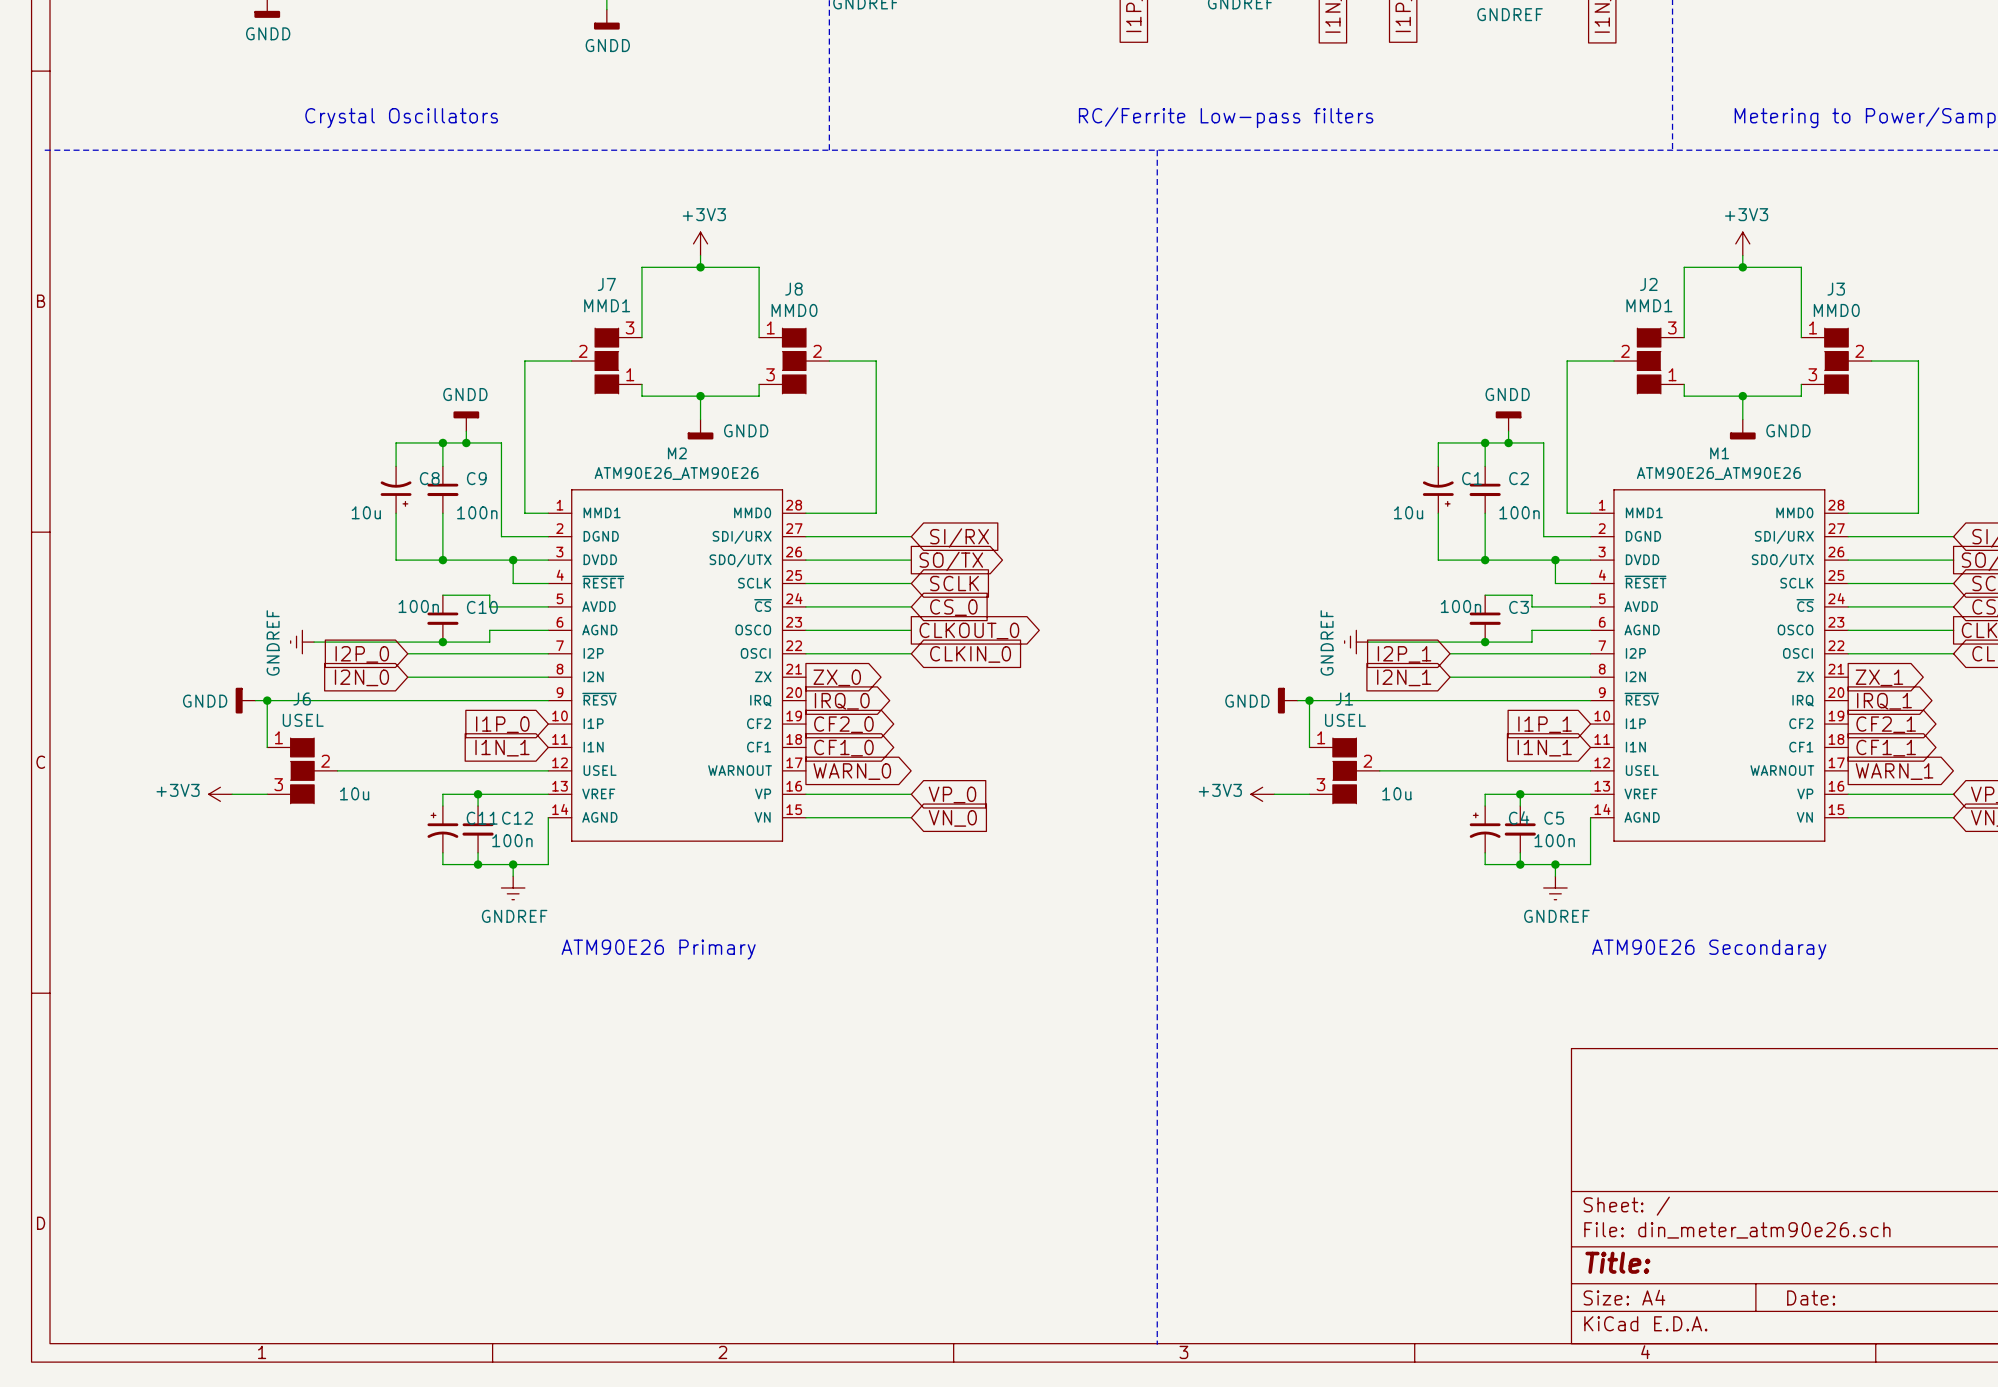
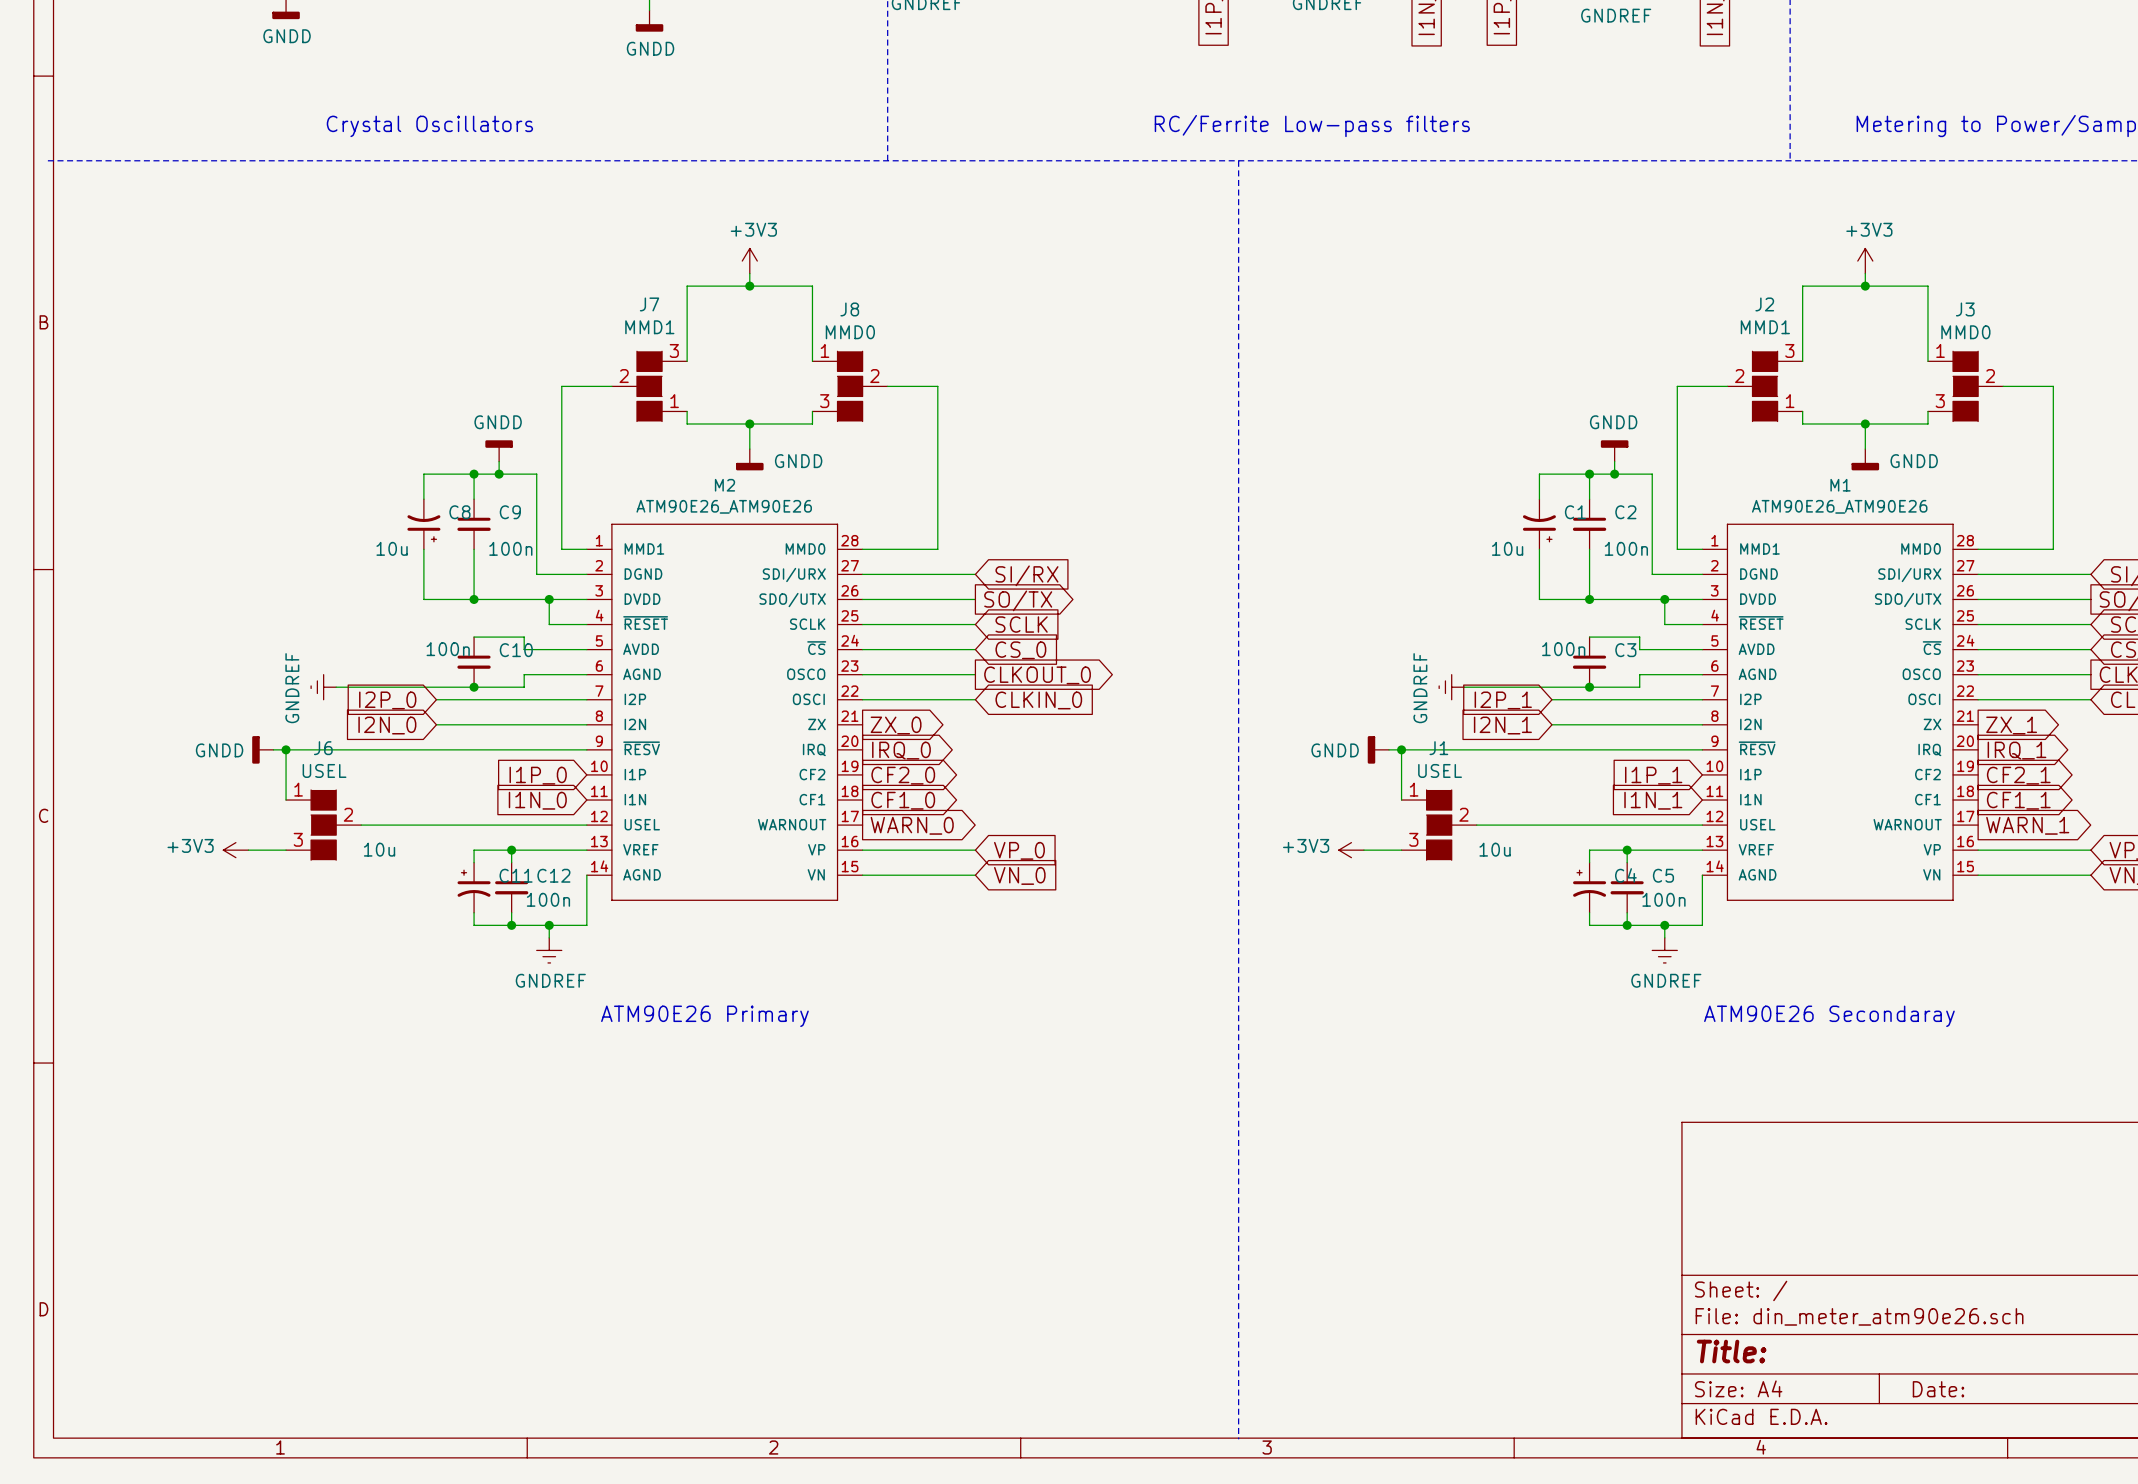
global label: I1N_1 (502, 748) -> I1N_0 (537, 800)

